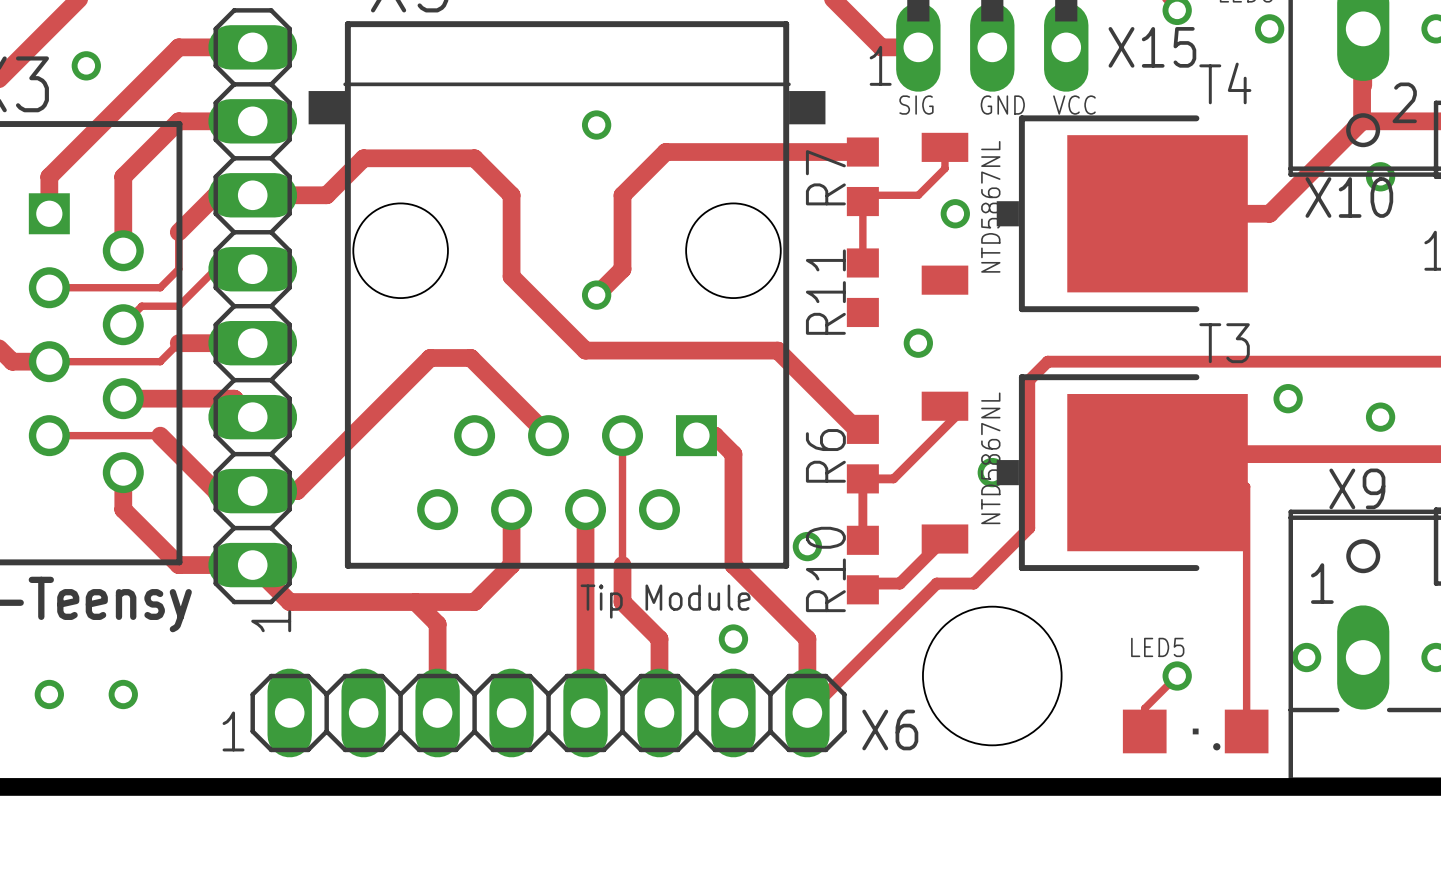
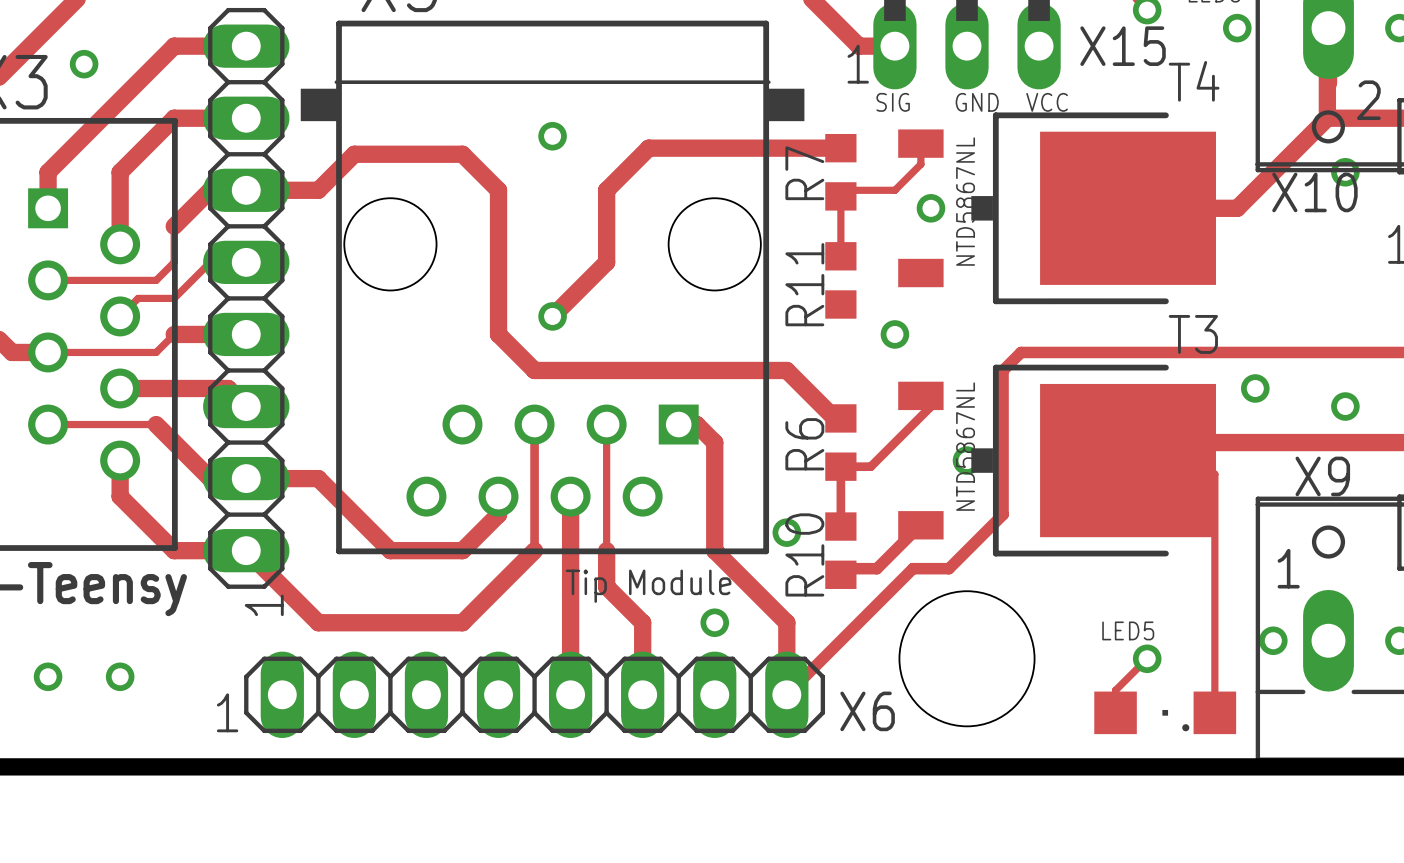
via position: (596, 125) -> (552, 136)
track: (511, 276) (585, 350) (777, 350) (807, 380) -> (498, 269) (498, 334) (534, 370) (786, 370)
track: none -> (581, 287) (552, 316)
via position: (596, 295) -> (552, 316)
track: (548, 435) (470, 357) (430, 357) (297, 491) -> (498, 514) (462, 550) (390, 550) (318, 478) (289, 478)
track: (511, 528) (511, 565) (474, 602) (289, 602) -> (534, 424) (534, 550) (462, 622) (318, 622) (282, 586)
track: (415, 602) (437, 624) (437, 712) -> none

